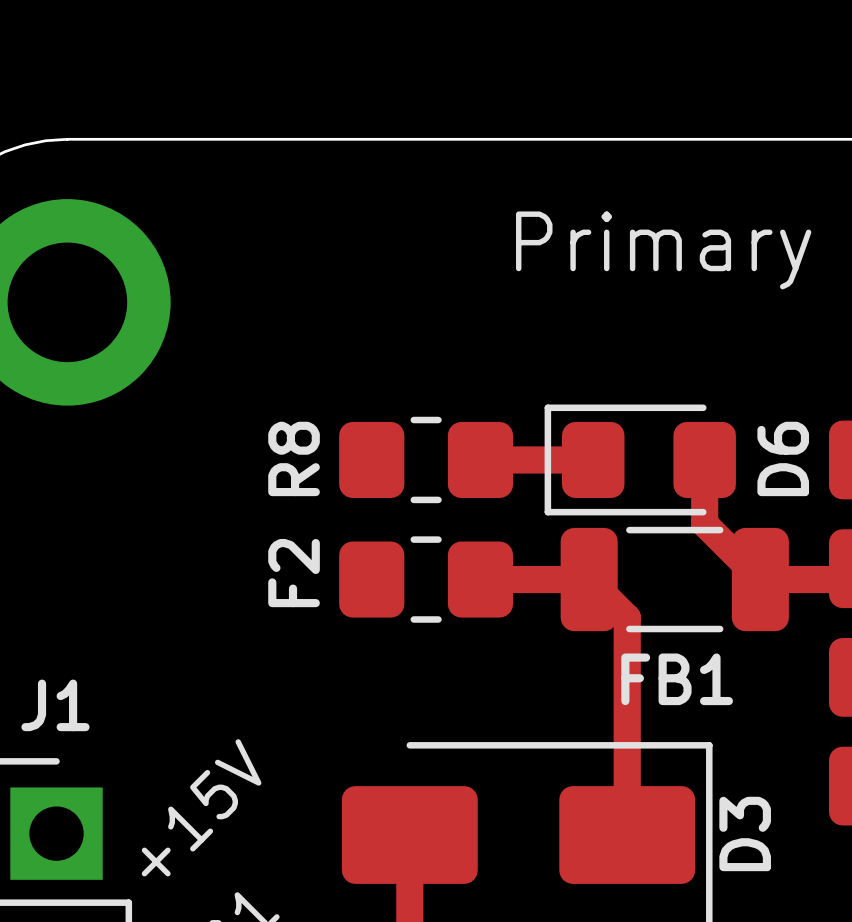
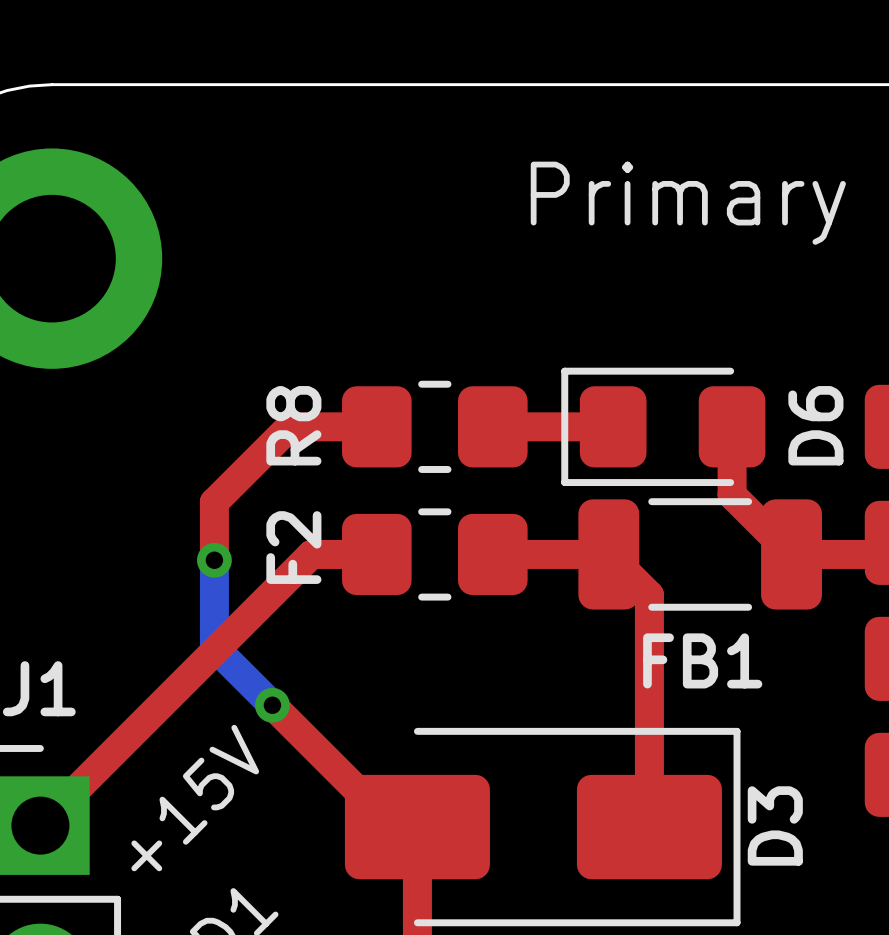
top track: none -> (376, 426) (289, 426) (214, 502) (214, 560)
top track: none -> (376, 554) (311, 554) (40, 825)
bottom track: none -> (214, 560) (214, 647) (272, 705)
via: none -> (214, 560)
top track: none -> (272, 705) (394, 827) (417, 827)
via: none -> (272, 705)

